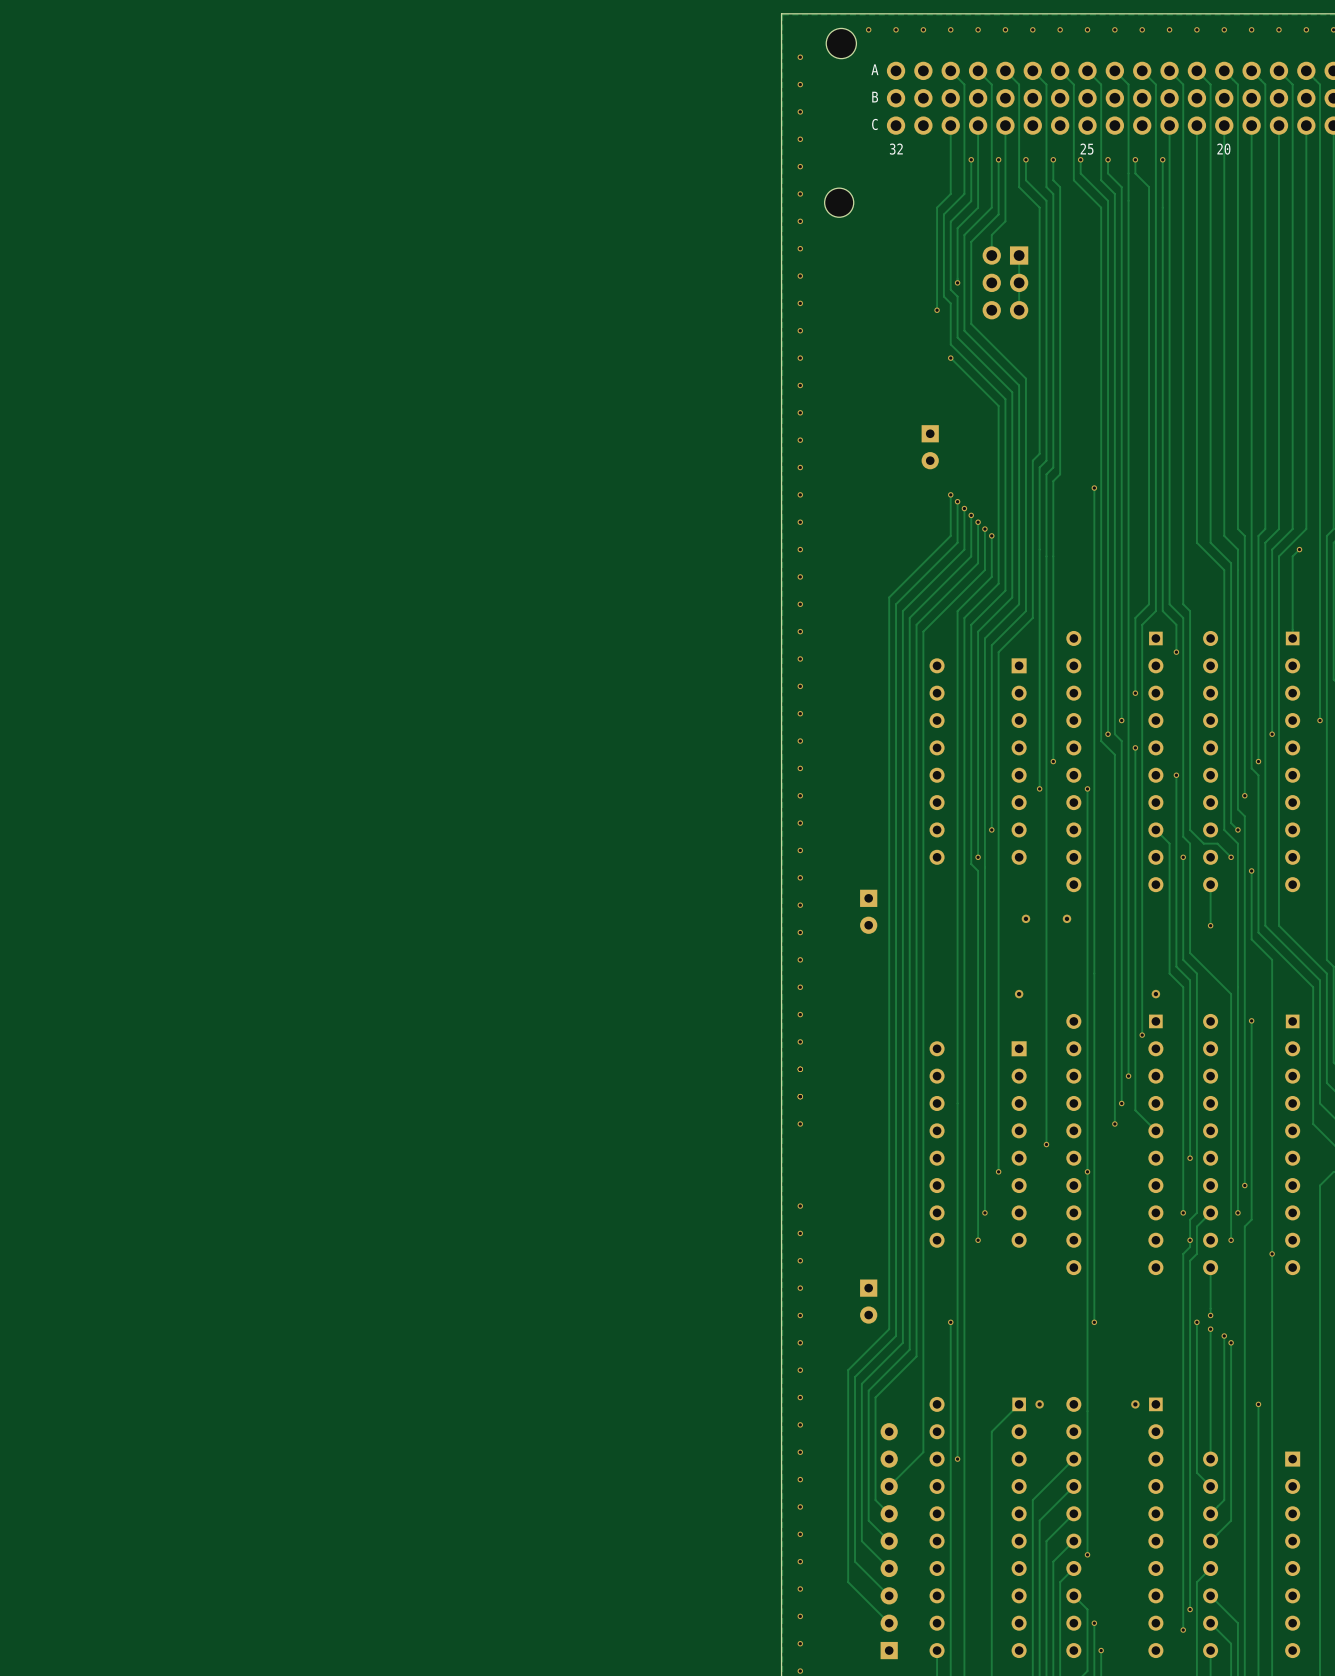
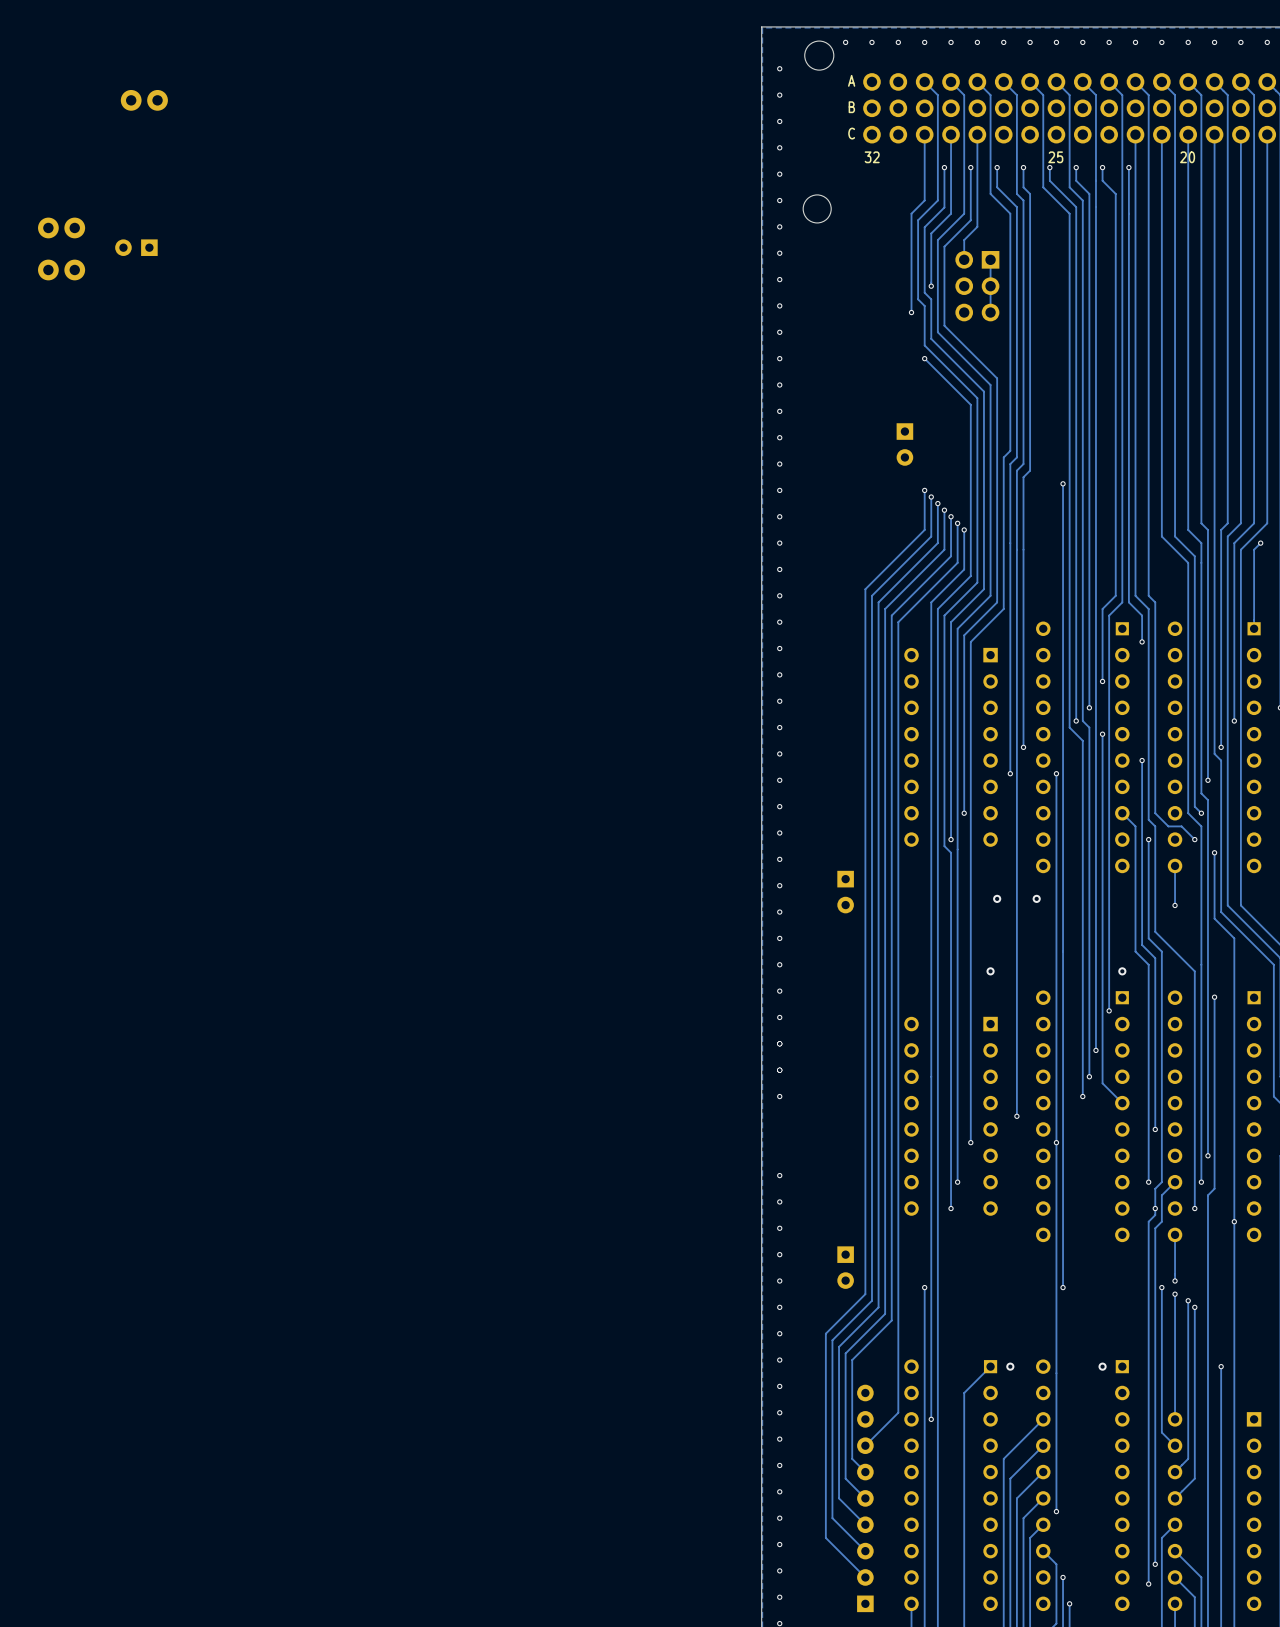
part: none -> (144, 100)
part: none -> (61, 227)
part: none -> (136, 247)
part: none -> (61, 269)

